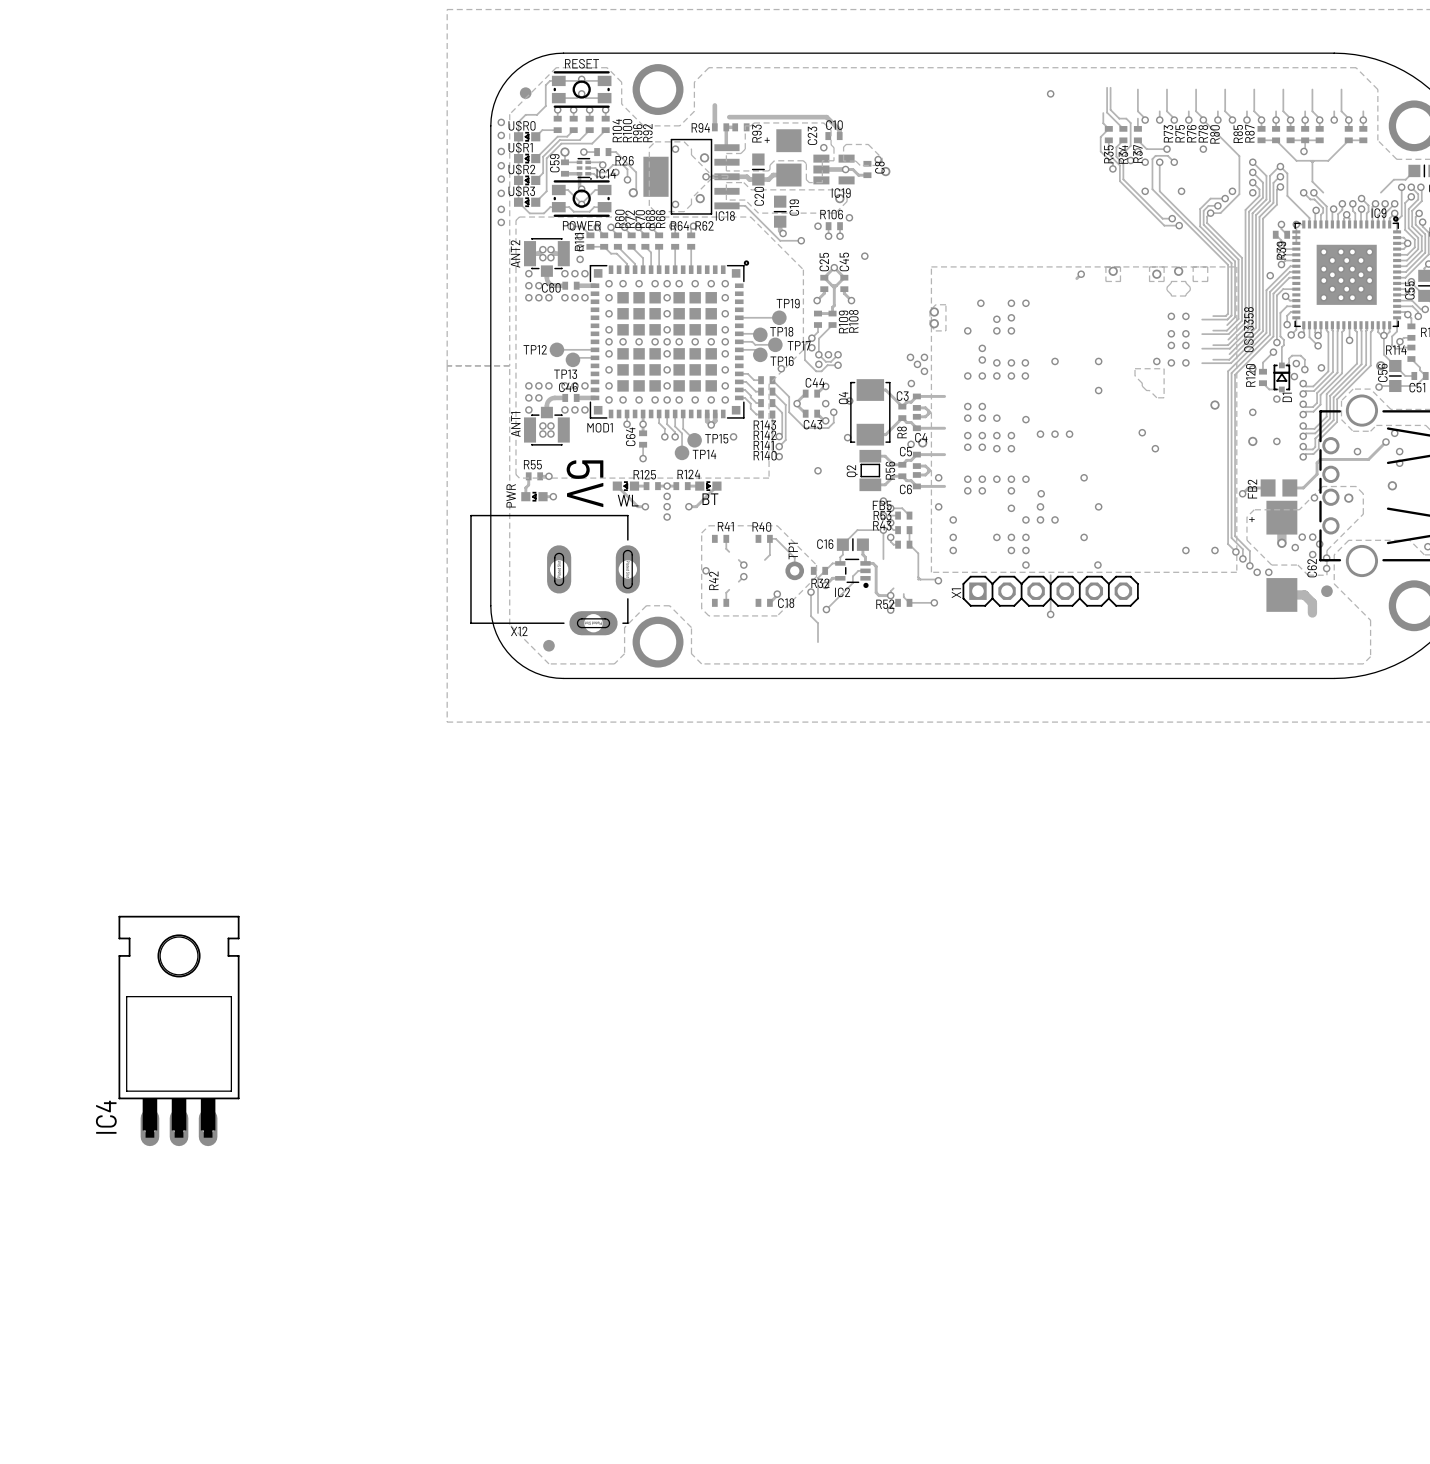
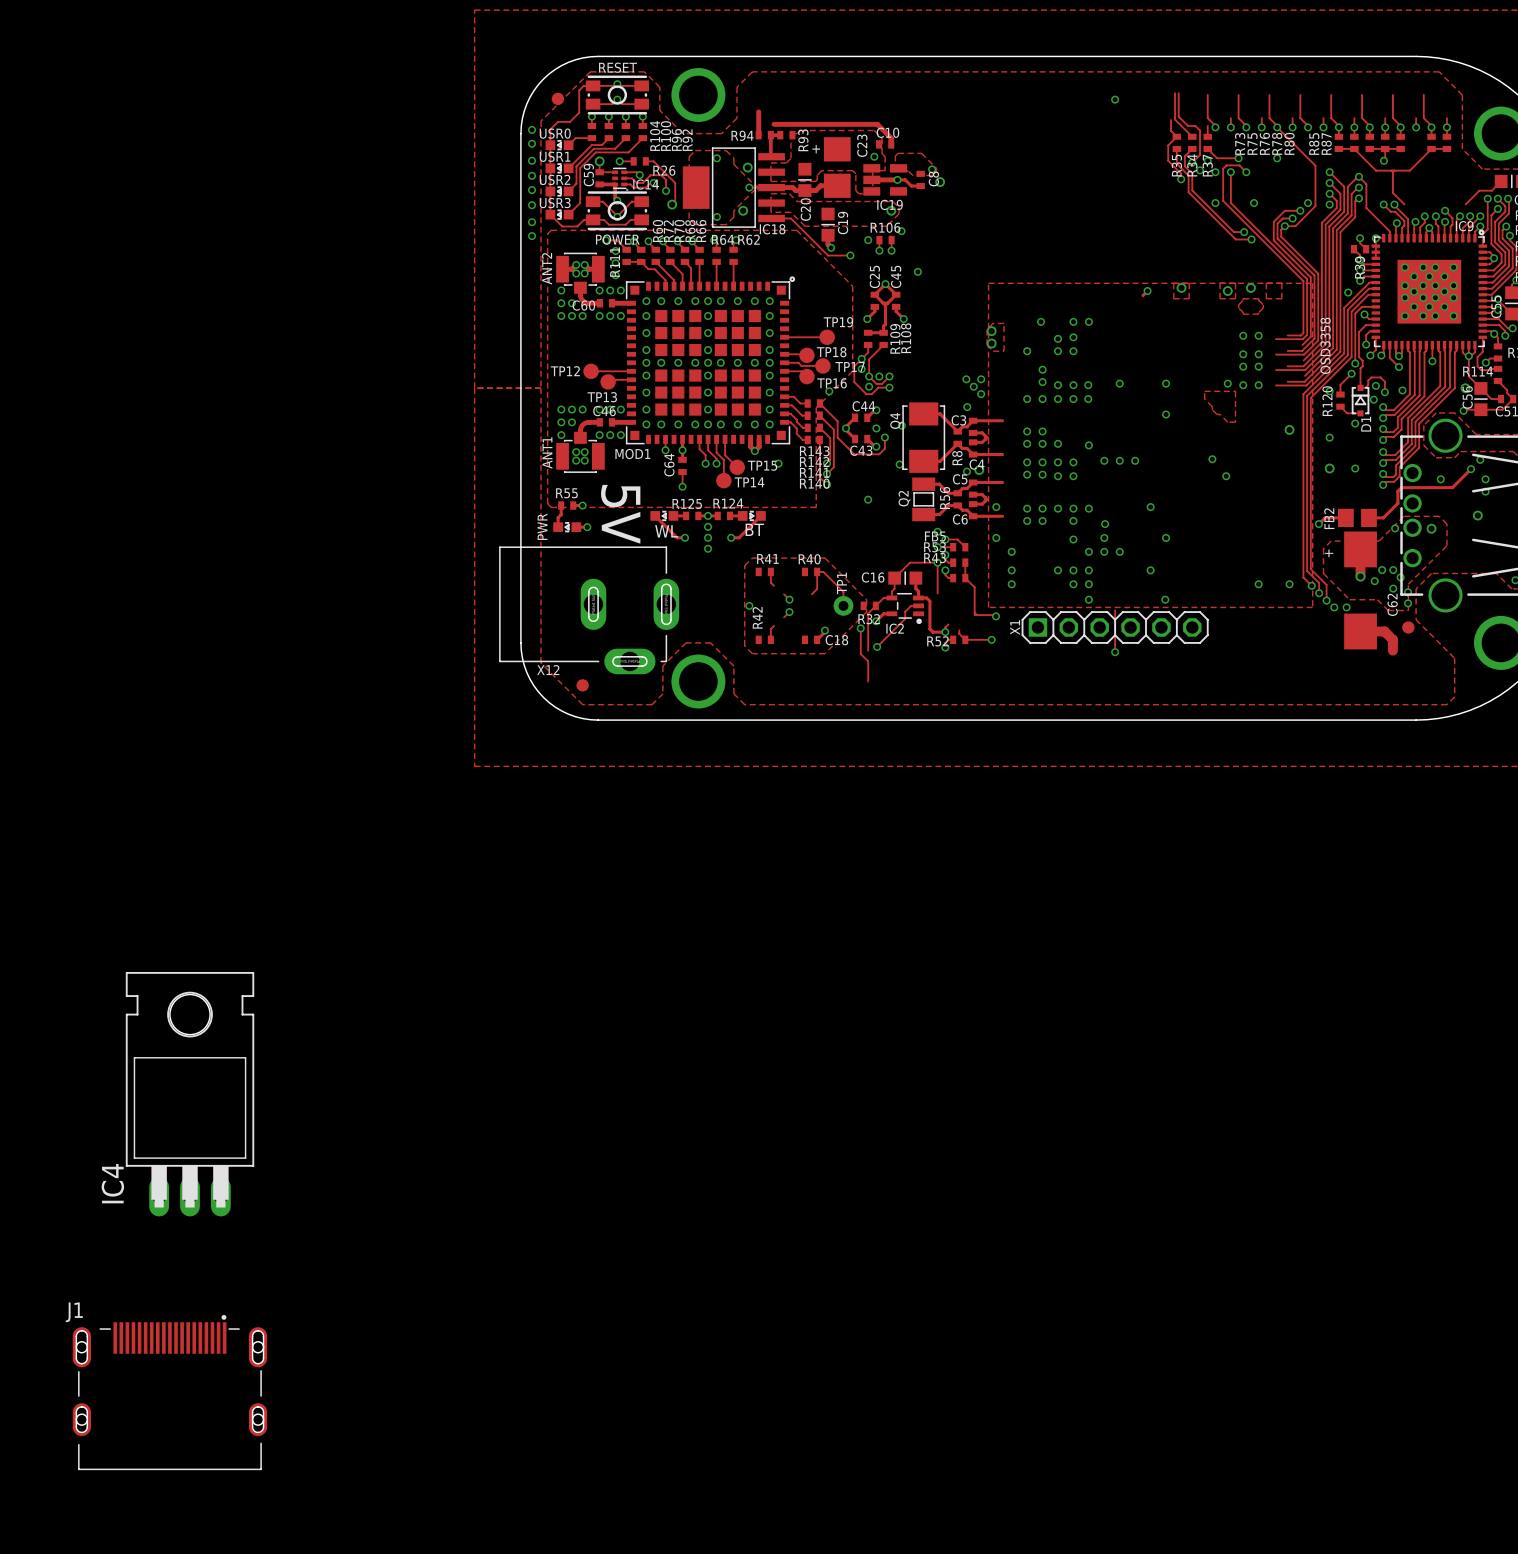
J1: none -> (169, 1392)

